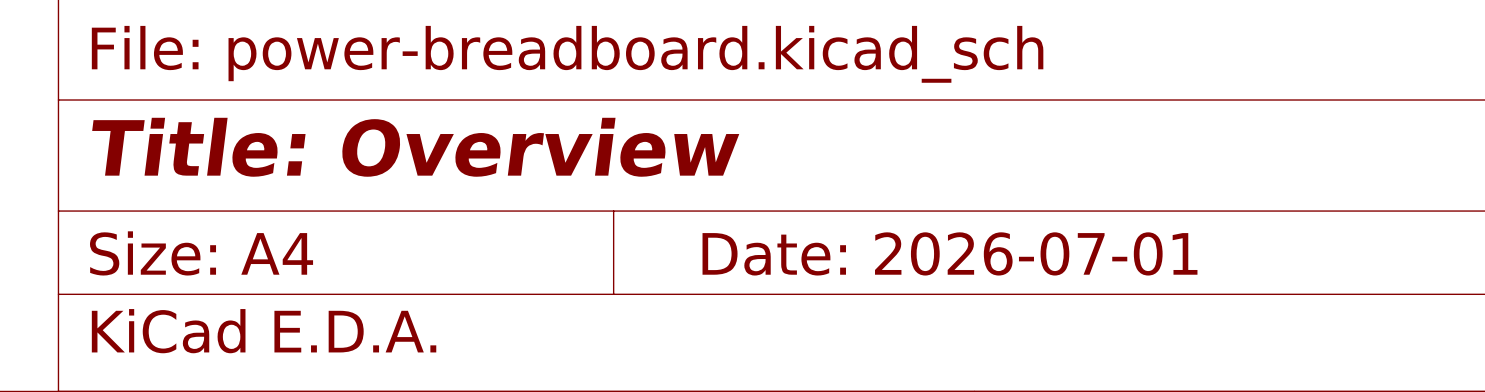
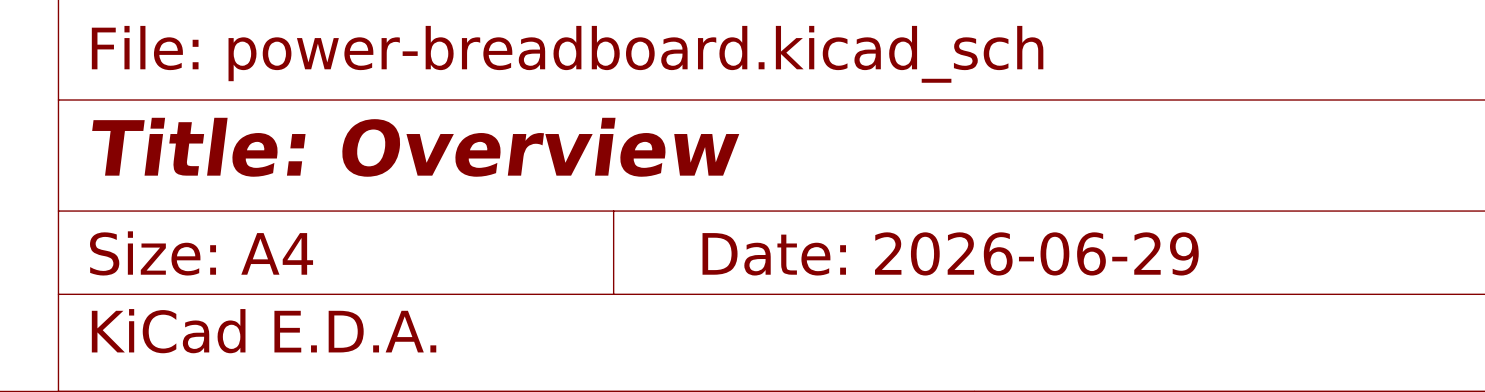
title block: Date: 2026-07-01 (949, 253) -> Date: 2026-06-29 (950, 253)

